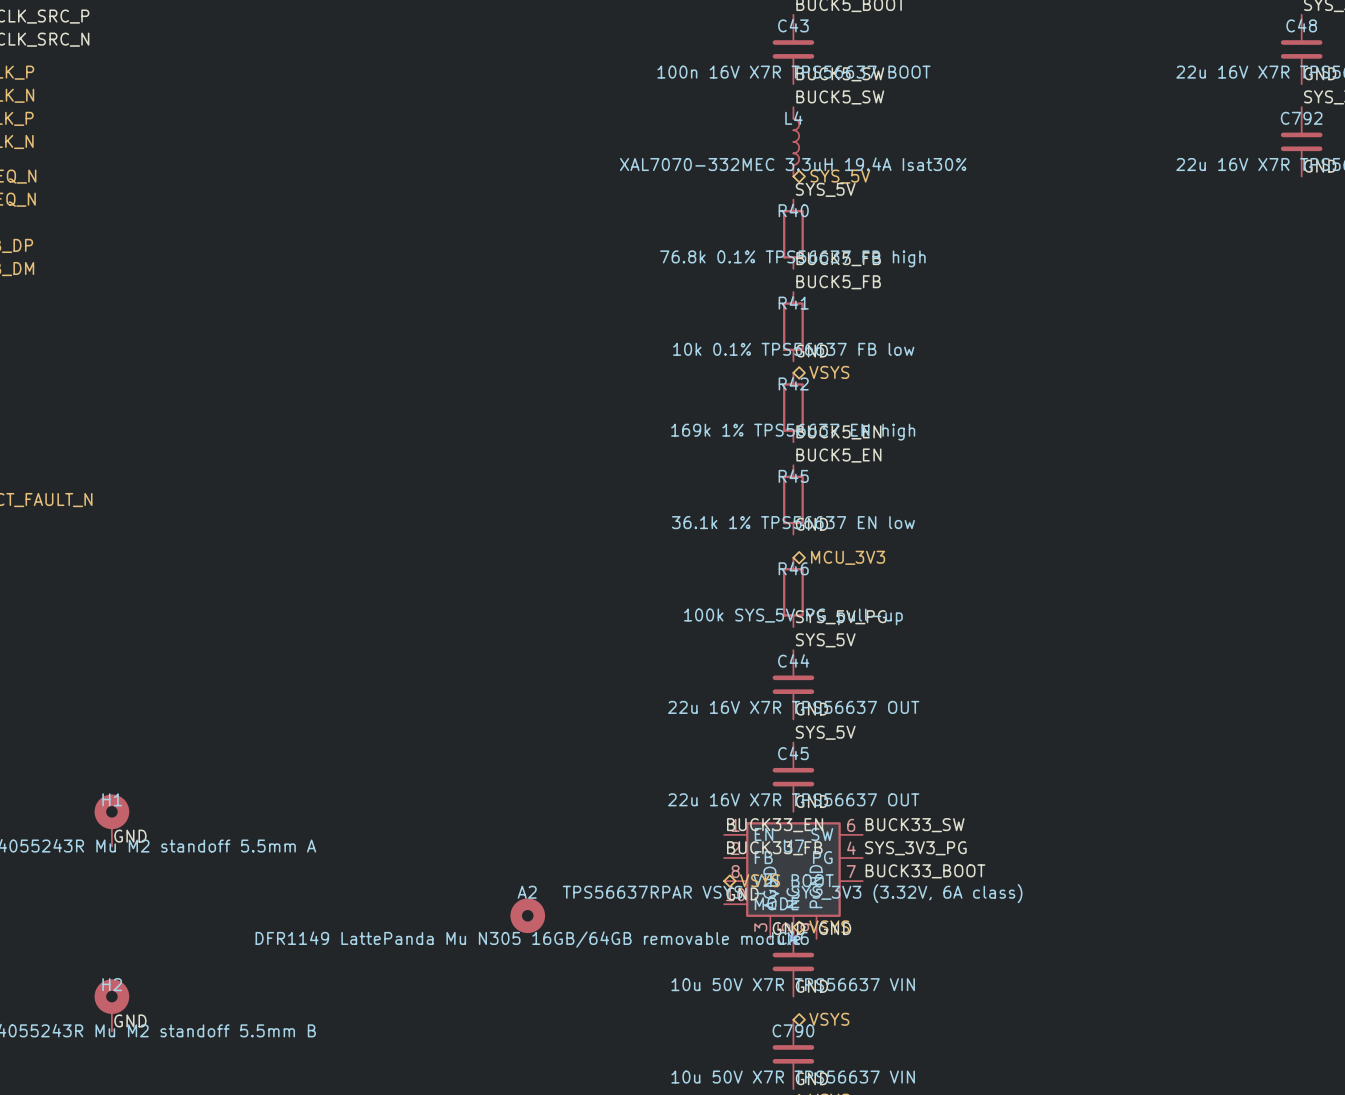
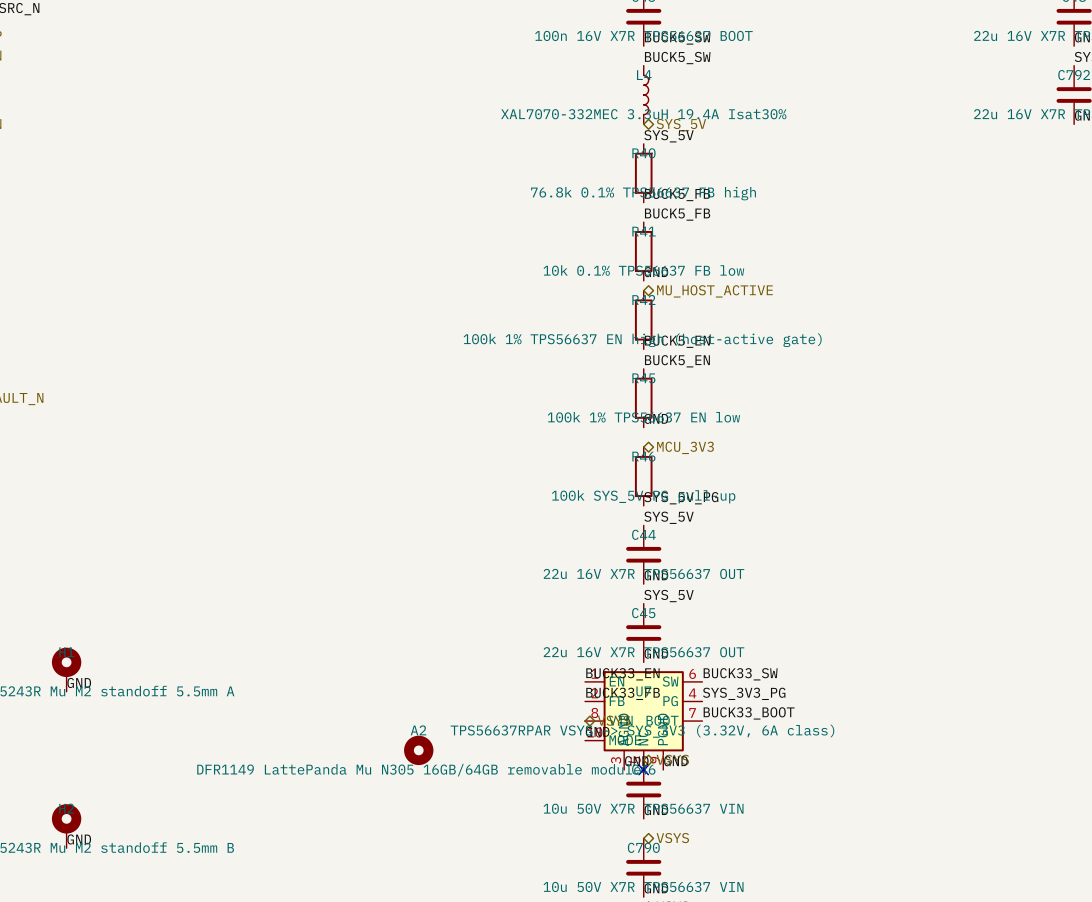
hierarchical label: VSYS (829, 372) -> MU_HOST_ACTIVE (714, 291)
R42 value: 169k 1% TPS56637 EN high (793, 432) -> 100k 1% TPS56637 EN high (host-active gate) (642, 340)
R45 value: 36.1k 1% TPS56637 EN low (793, 522) -> 100k 1% TPS56637 EN low (643, 417)

